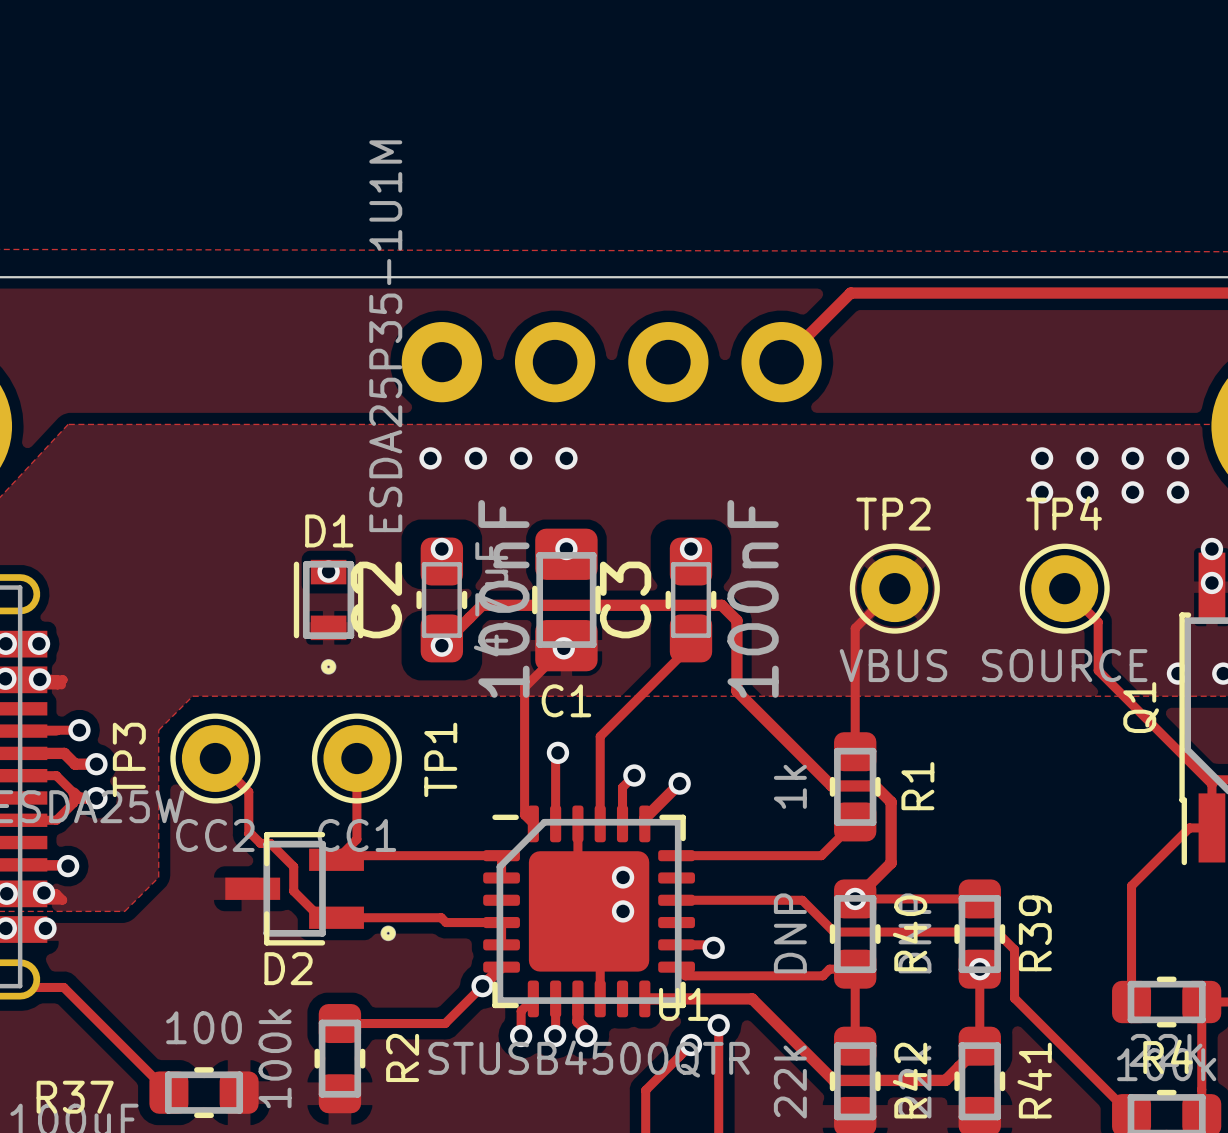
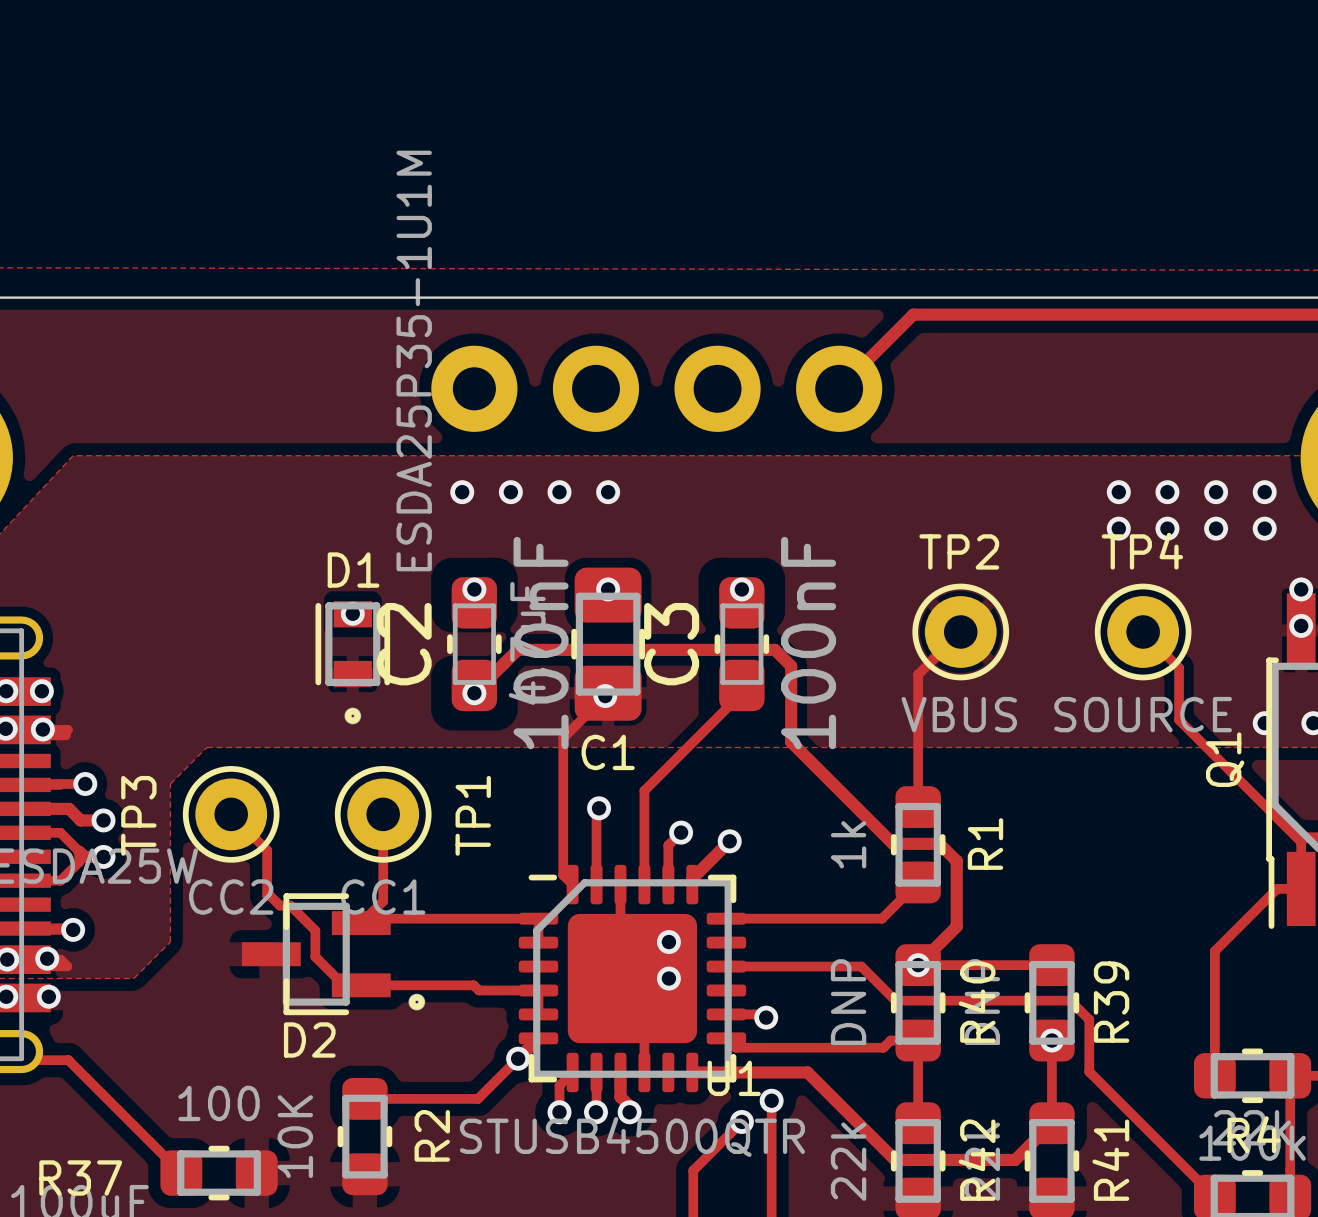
R2 value: 100k (275, 1058) -> 10K (295, 1136)

